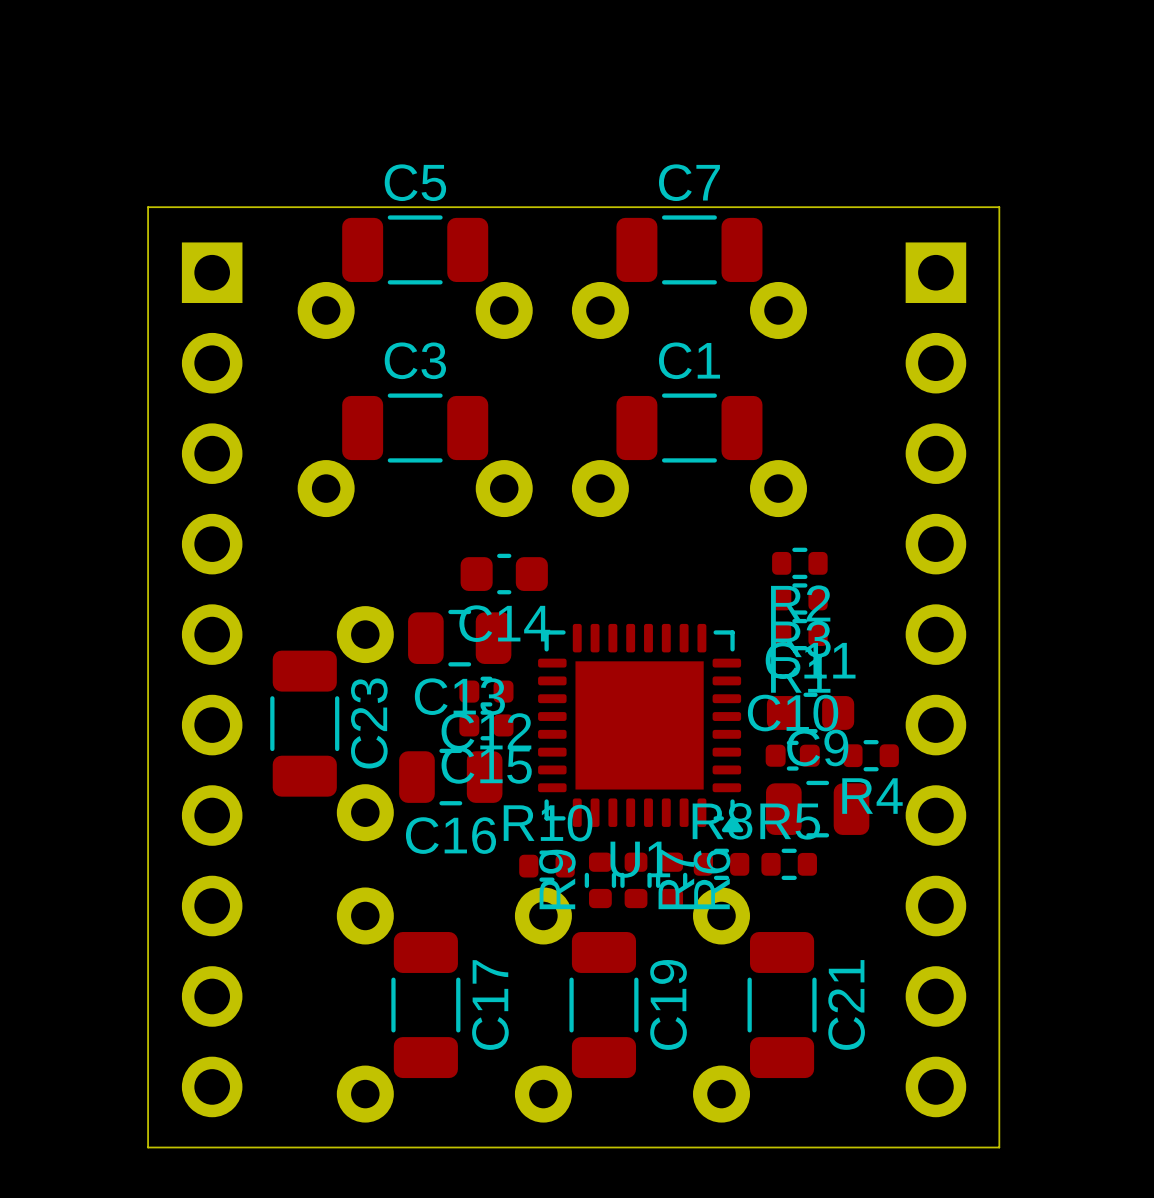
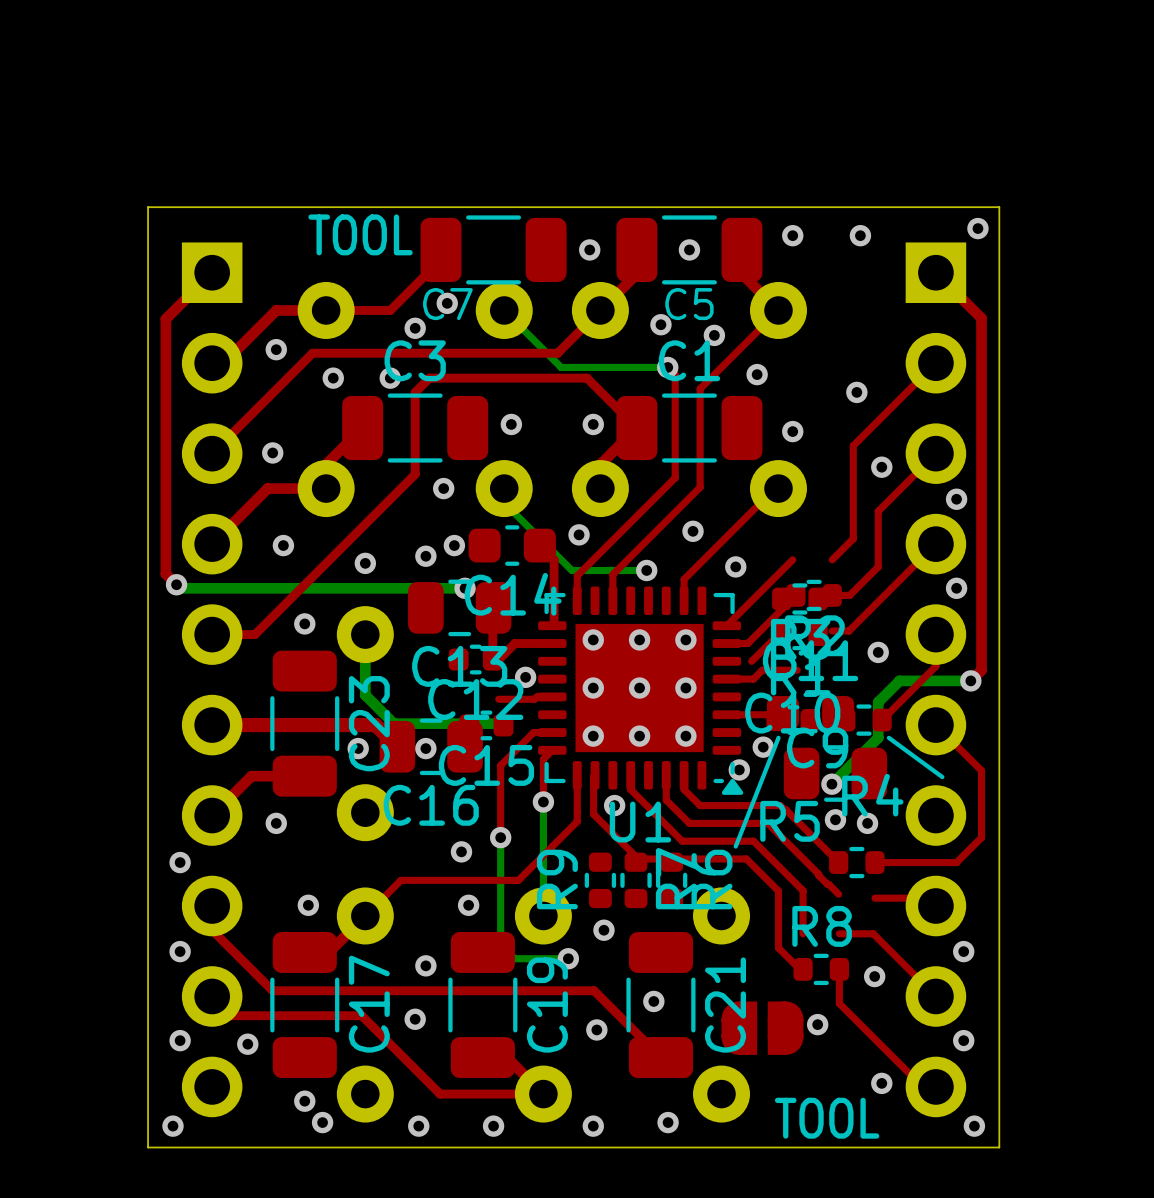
C7 name: C7 (689, 182) -> C5 (689, 304)
via: none -> (977, 228)
text: none -> TOOL (360, 234)
via: none -> (792, 235)
via: none -> (860, 235)
C5: (415, 249) -> none
C7: none -> (493, 249)
via: none -> (589, 249)
via: none -> (689, 249)
top track: none -> (441, 259) (390, 310) (276, 310) (223, 363)
top track: none -> (212, 272) (165, 319) (165, 574) (176, 584)
top track: none -> (935, 272) (981, 318) (981, 670) (970, 680)
top track: none -> (636, 273) (557, 353) (312, 353) (212, 453)
top track: none -> (741, 273) (778, 310) (700, 388) (700, 487) (612, 574) (612, 600)
via: none -> (447, 303)
bottom track: none -> (504, 310) (561, 367) (667, 367)
via: none -> (660, 324)
via: none -> (415, 328)
via: none -> (714, 335)
via: none -> (276, 349)
top track: none -> (935, 363) (853, 445) (853, 538) (832, 559)
top track: none -> (667, 367) (675, 374) (675, 477) (577, 575) (577, 600)
via: none -> (667, 367)
via: none -> (757, 374)
via: none -> (333, 378)
via: none -> (390, 378)
via: none -> (856, 392)
via: none -> (511, 424)
via: none -> (593, 424)
top track: none -> (362, 428) (326, 464) (326, 488) (267, 488) (212, 544)
via: none -> (792, 431)
via: none -> (272, 452)
top track: none -> (935, 453) (878, 511) (878, 566) (849, 595) (832, 595)
via: none -> (881, 467)
via: none -> (443, 488)
top track: none -> (600, 488) (600, 464) (636, 428) (587, 378) (429, 378) (415, 392) (415, 474) (254, 634) (212, 634)
top track: none -> (774, 488) (684, 579) (684, 600)
via: none -> (956, 499)
bottom track: none -> (504, 502) (571, 570) (646, 570)
via: none -> (693, 531)
via: none -> (579, 534)
top track: none -> (935, 544) (849, 631) (832, 631)
via: none -> (283, 545)
via: none -> (454, 545)
top track: none -> (539, 545) (554, 559) (554, 623) (552, 625)
via: none -> (425, 556)
top track: none -> (792, 559) (726, 625)
via: none -> (365, 563)
R2 position: (799, 563) -> (814, 595)
via: none -> (735, 566)
via: none -> (646, 570)
C14 position: (504, 574) -> (512, 545)
bottom track: none -> (176, 584) (180, 588) (465, 588)
via: none -> (176, 584)
via: none -> (465, 588)
via: none -> (956, 588)
top track: none -> (795, 595) (747, 643) (726, 643)
top track: none -> (492, 608) (492, 659) (498, 659) (514, 643) (552, 643)
via: none -> (304, 623)
top track: none -> (782, 631) (751, 661)
bottom track: none -> (365, 634) (365, 695) (393, 723) (506, 723)
top track: none -> (935, 634) (935, 666) (882, 720)
C13 position: (459, 638) -> (459, 607)
via: none -> (593, 639)
via: none -> (639, 639)
via: none -> (685, 639)
via: none -> (878, 652)
top track: none -> (797, 670) (762, 670) (753, 679) (726, 679)
via: none -> (525, 677)
bottom track: none -> (970, 680) (899, 680) (878, 702) (878, 737) (831, 784)
via: none -> (970, 680)
via: none -> (593, 688)
via: none -> (639, 688)
via: none -> (685, 688)
C12 position: (486, 691) -> (475, 659)
top track: none -> (552, 696) (537, 696) (534, 699) (498, 699)
top track: none -> (726, 714) (771, 714)
top track: none -> (212, 725) (375, 725) (397, 746)
top track: none -> (935, 725) (981, 770) (981, 837) (956, 862) (875, 862)
U1 position: (640, 728) -> (640, 690)
top track: none -> (552, 732) (533, 732) (500, 765) (500, 837)
via: none -> (593, 736)
via: none -> (639, 736)
via: none -> (685, 736)
line: none -> (778, 737) (735, 846)
line: none -> (888, 737) (942, 777)
via: none -> (763, 747)
via: none -> (358, 748)
via: none -> (425, 748)
top track: none -> (552, 750) (543, 759) (543, 802)
C10 position: (792, 755) -> (793, 720)
R4 position: (871, 755) -> (863, 720)
via: none -> (739, 769)
top track: none -> (577, 775) (577, 821) (518, 880) (400, 880) (328, 952)
top track: none -> (595, 775) (593, 814) (638, 858) (746, 858) (778, 891) (778, 948) (799, 969)
top track: none -> (630, 775) (630, 789) (682, 841) (753, 841) (803, 890) (803, 933)
top track: none -> (666, 775) (666, 800) (689, 823) (767, 823) (838, 894)
top track: none -> (684, 775) (684, 789) (700, 805) (780, 805) (838, 862)
top track: none -> (304, 776) (251, 776) (212, 815)
C16 position: (450, 777) -> (431, 746)
via: none -> (831, 784)
bottom track: none -> (543, 802) (543, 915)
via: none -> (543, 802)
via: none -> (614, 805)
C9 position: (817, 809) -> (835, 773)
via: none -> (835, 819)
via: none -> (276, 823)
via: none -> (867, 823)
bottom track: none -> (500, 837) (500, 944) (514, 958) (568, 958)
via: none -> (500, 837)
via: none -> (461, 851)
via: none -> (180, 862)
R8 position: (721, 864) -> (821, 969)
R5 position: (789, 864) -> (856, 862)
R10: (546, 866) -> none
top track: none -> (875, 898) (928, 898)
via: none -> (308, 905)
via: none -> (468, 905)
top track: none -> (212, 930) (272, 990) (594, 990) (660, 1057)
via: none -> (603, 930)
top track: none -> (839, 933) (873, 933) (935, 996)
via: none -> (180, 951)
via: none -> (963, 951)
via: none -> (568, 958)
via: none -> (425, 965)
top track: none -> (839, 969) (839, 1003) (922, 1086)
via: none -> (874, 976)
top track: none -> (212, 996) (231, 1015) (361, 1015) (440, 1094) (543, 1094) (506, 1057)
via: none -> (653, 1001)
C17 position: (425, 1005) -> (304, 1005)
C19 position: (603, 1005) -> (482, 1005)
C21 position: (782, 1005) -> (660, 1005)
via: none -> (415, 1019)
via: none -> (817, 1024)
part: none -> (762, 1028)
via: none -> (596, 1029)
via: none -> (180, 1040)
via: none -> (963, 1040)
via: none -> (247, 1044)
via: none -> (881, 1083)
via: none -> (304, 1101)
text: none -> TOOL (827, 1118)
via: none -> (322, 1122)
via: none -> (668, 1122)
via: none -> (172, 1126)
via: none -> (418, 1126)
via: none -> (493, 1126)
via: none -> (593, 1126)
via: none -> (974, 1126)

